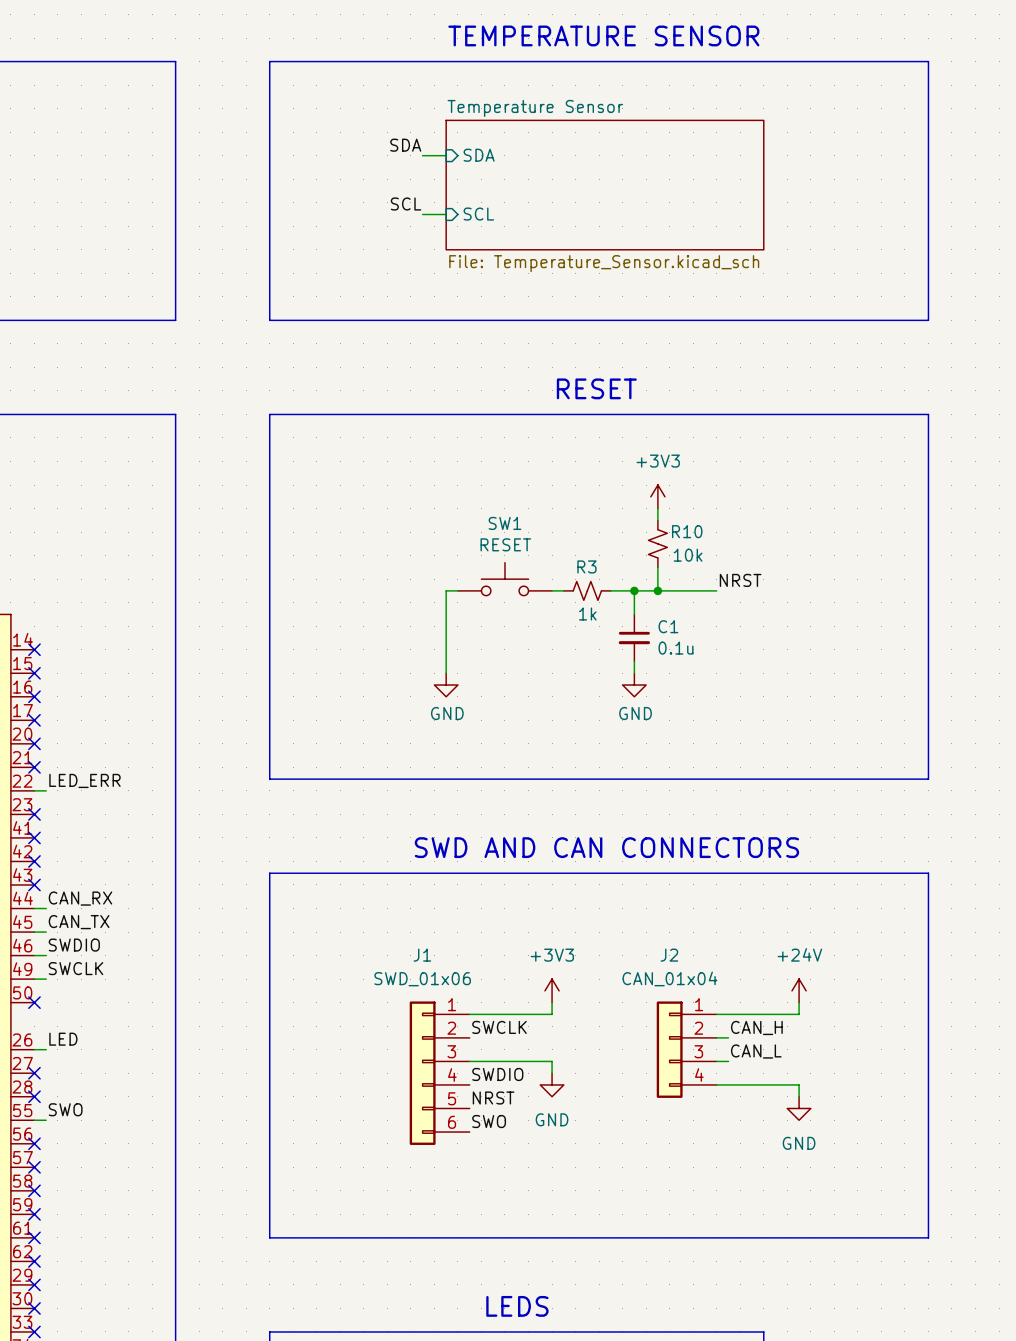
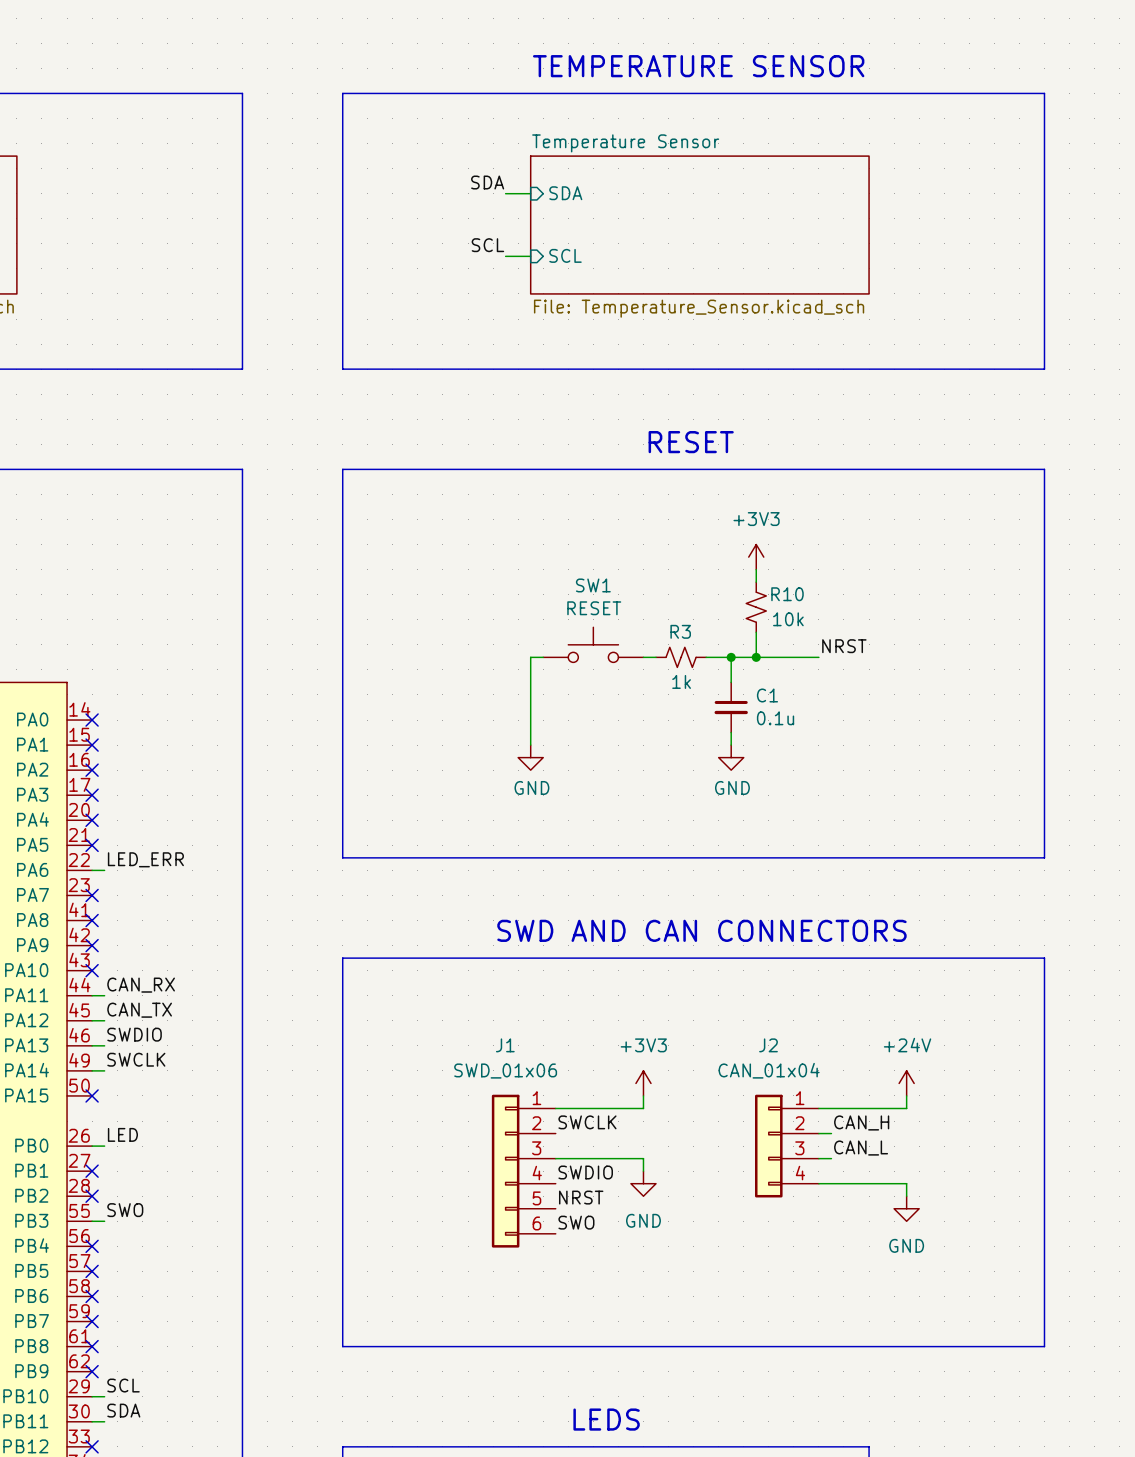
label: none -> SCL (123, 1385)
wire: none -> (92, 1396) (104, 1396)
no-connect mark: (34, 1284) -> none
label: none -> SDA (123, 1410)
wire: none -> (92, 1421) (104, 1421)
no-connect mark: (34, 1308) -> none

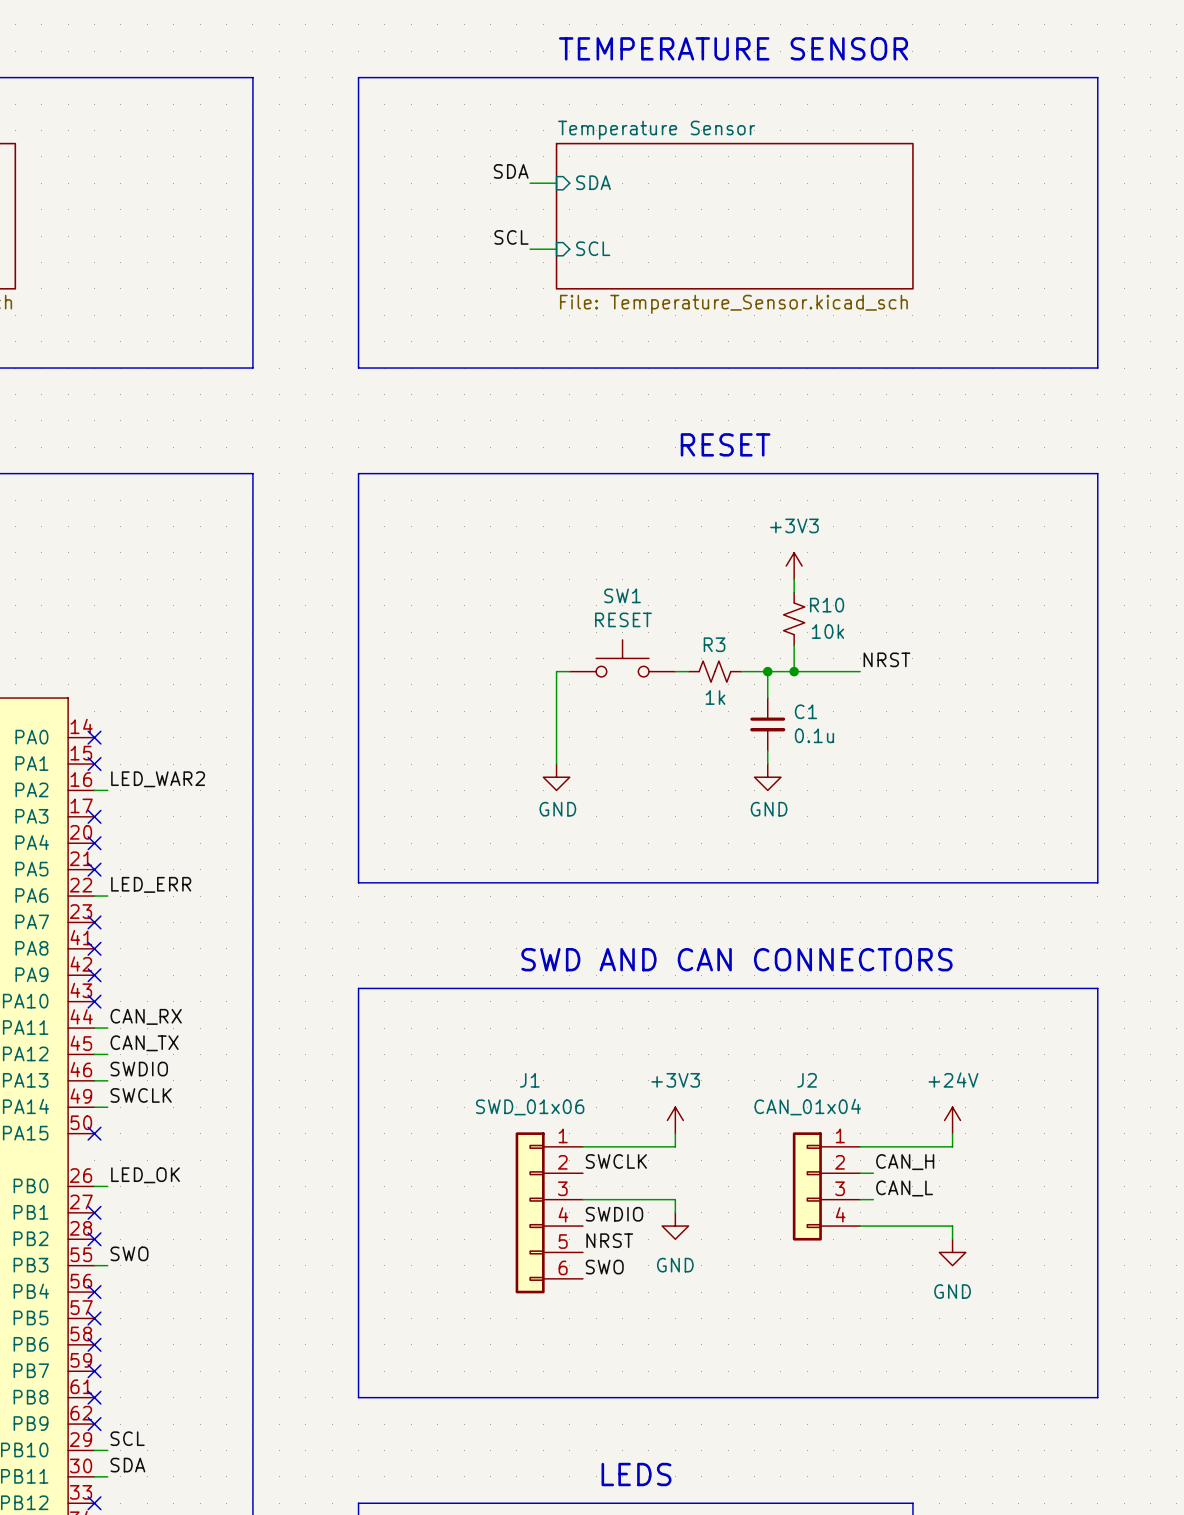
label: none -> LED_WAR2 (158, 779)
wire: none -> (94, 790) (107, 790)
no-connect mark: (92, 770) -> none
label: LED (122, 1134) -> LED_OK (145, 1175)

